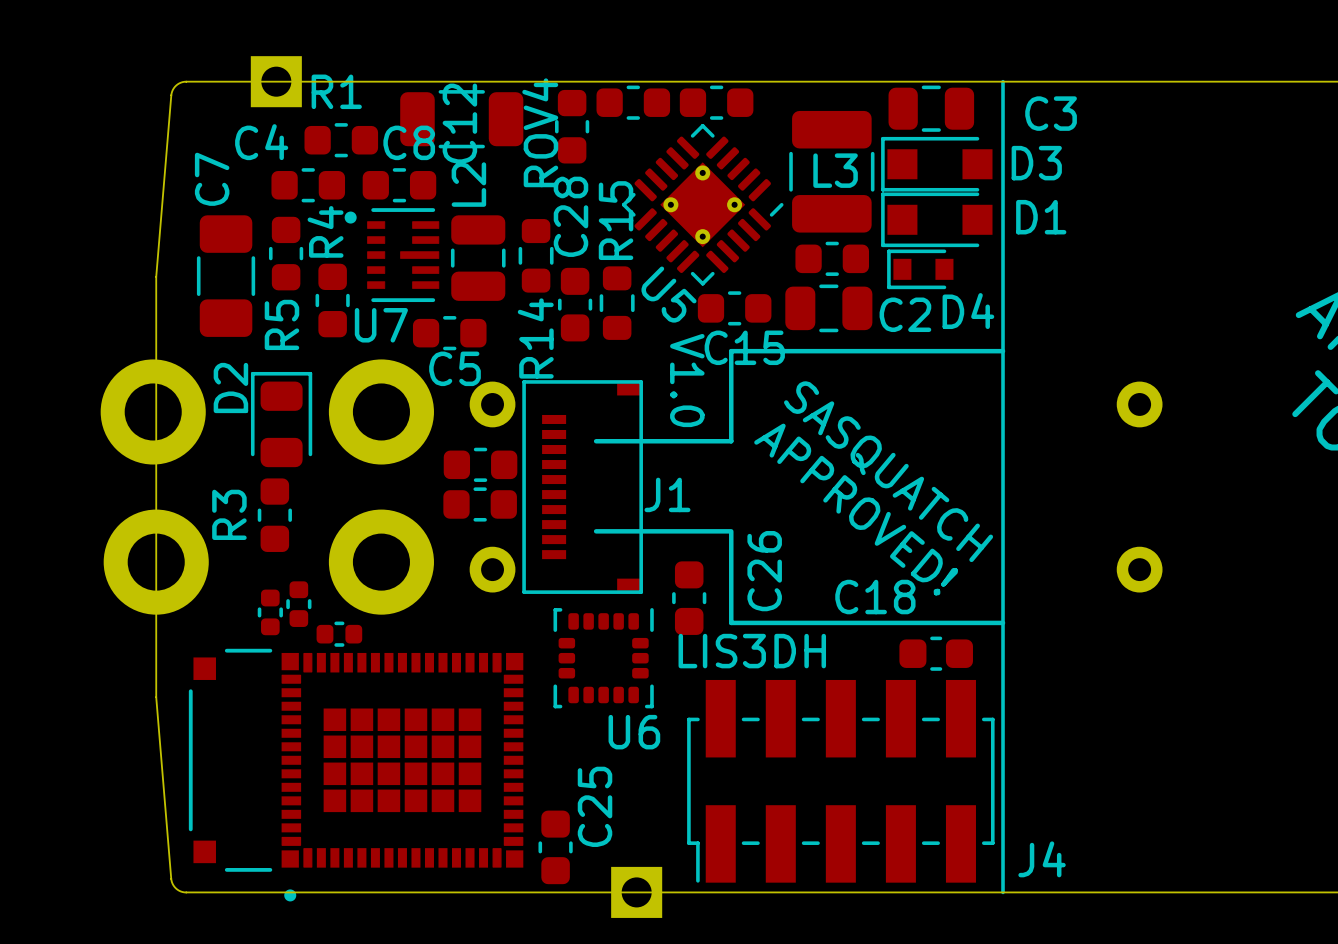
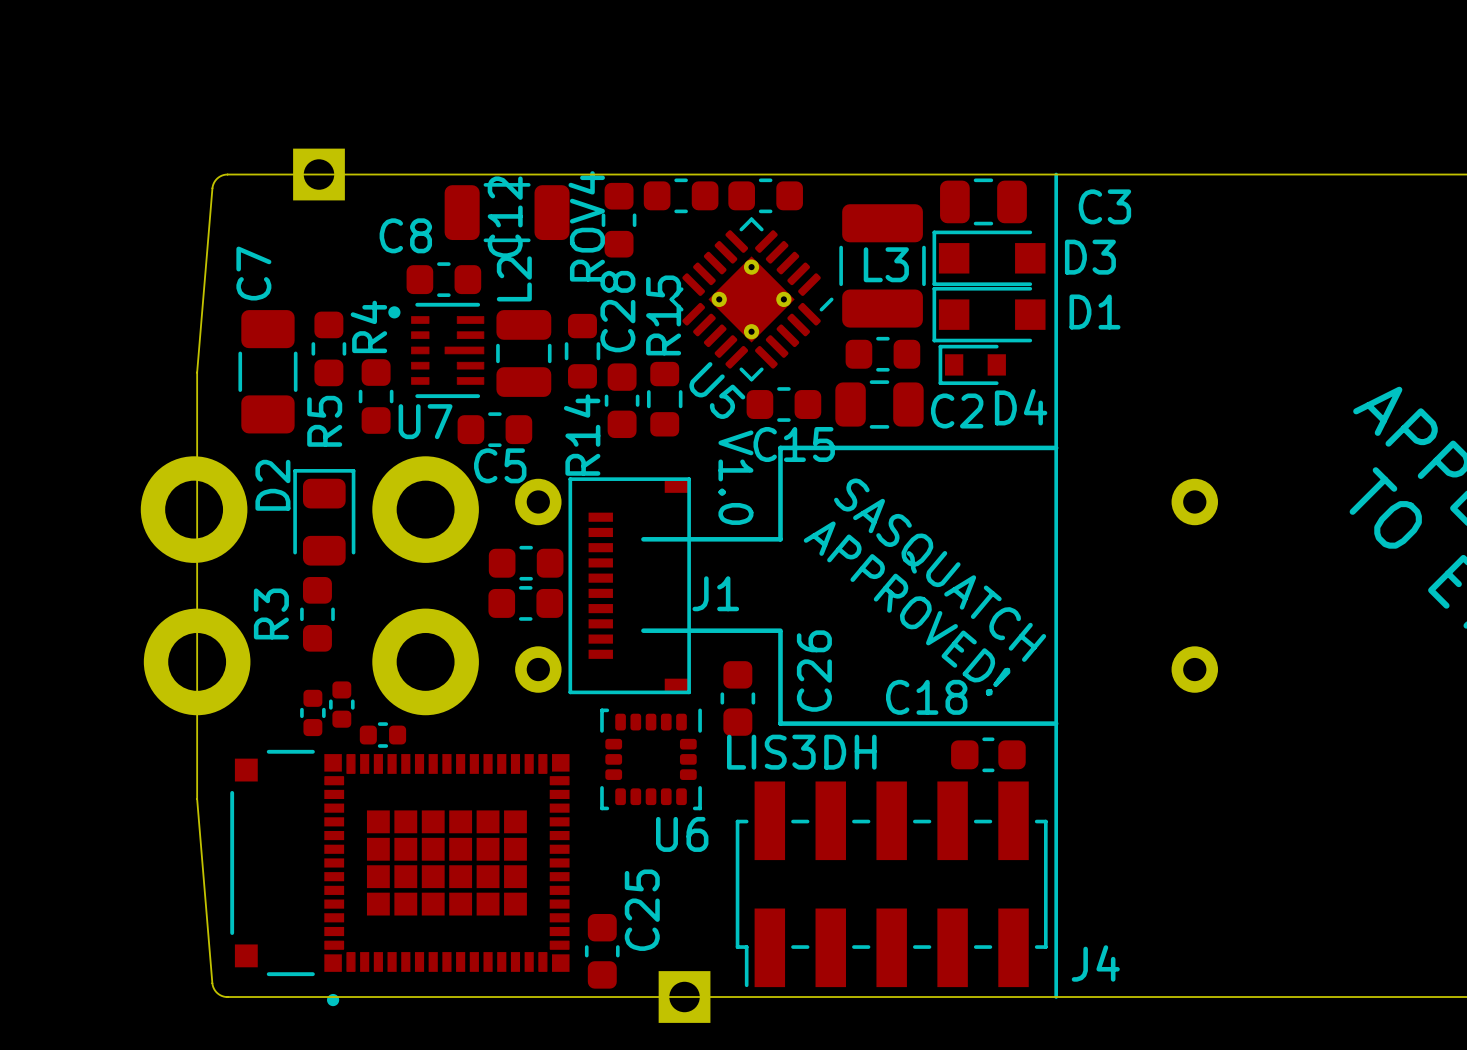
R1: (341, 140) -> none
C8 name position: C8 (409, 142) -> C8 (405, 235)
C4: (308, 185) -> none

